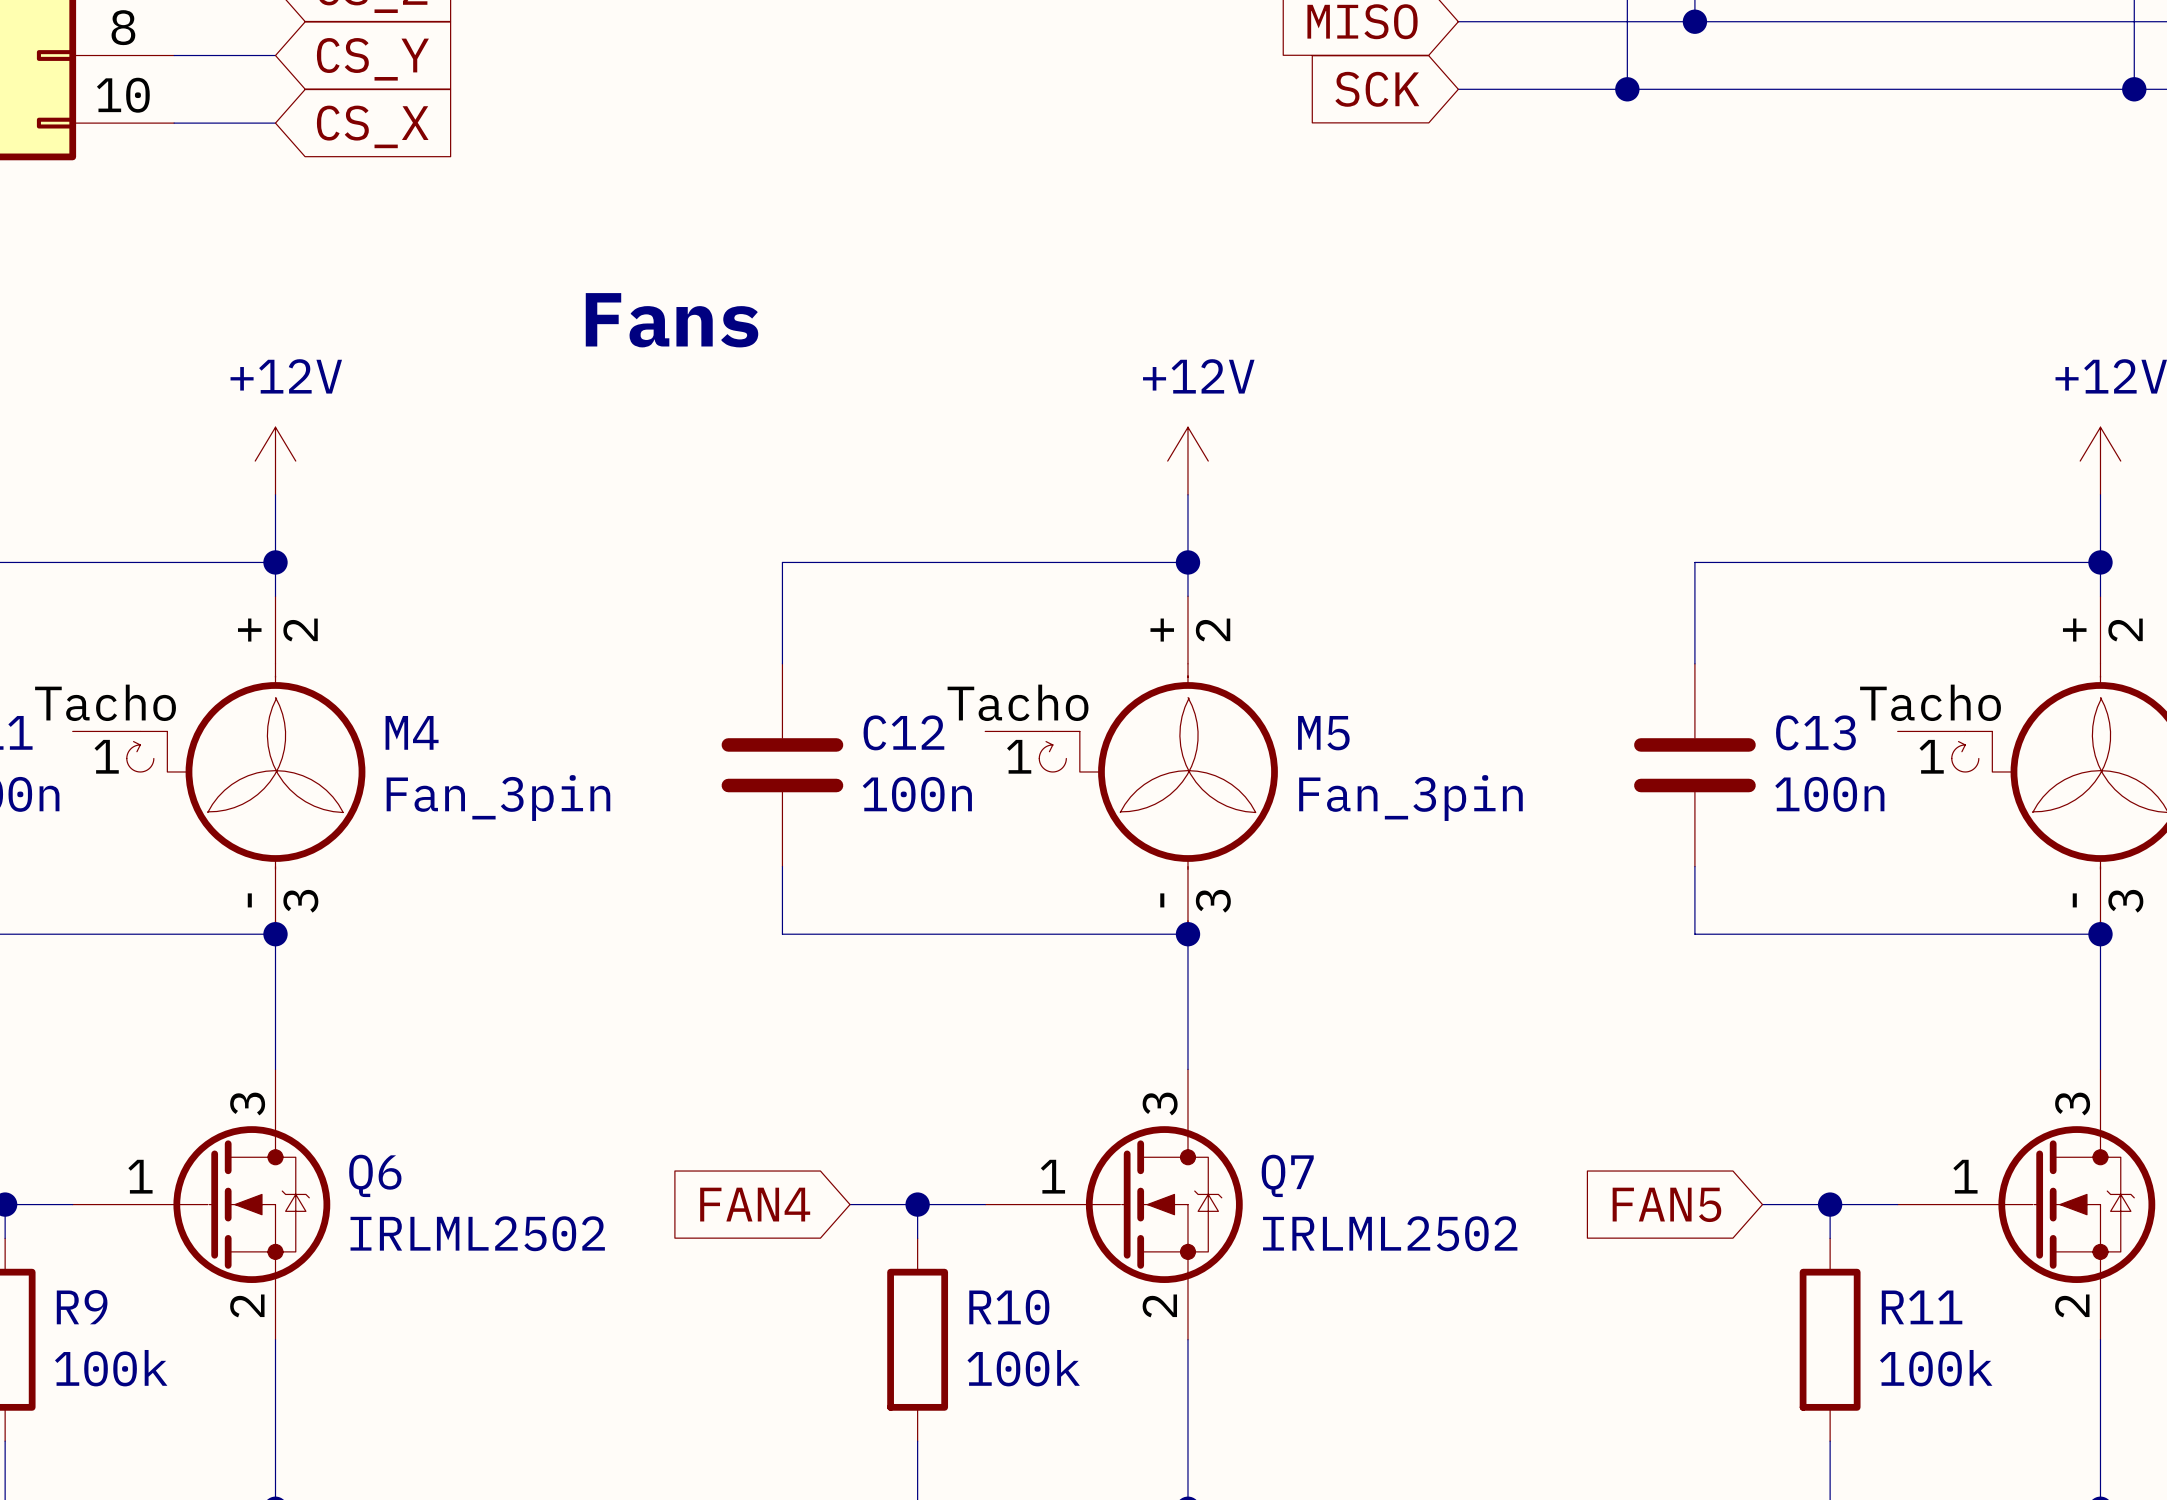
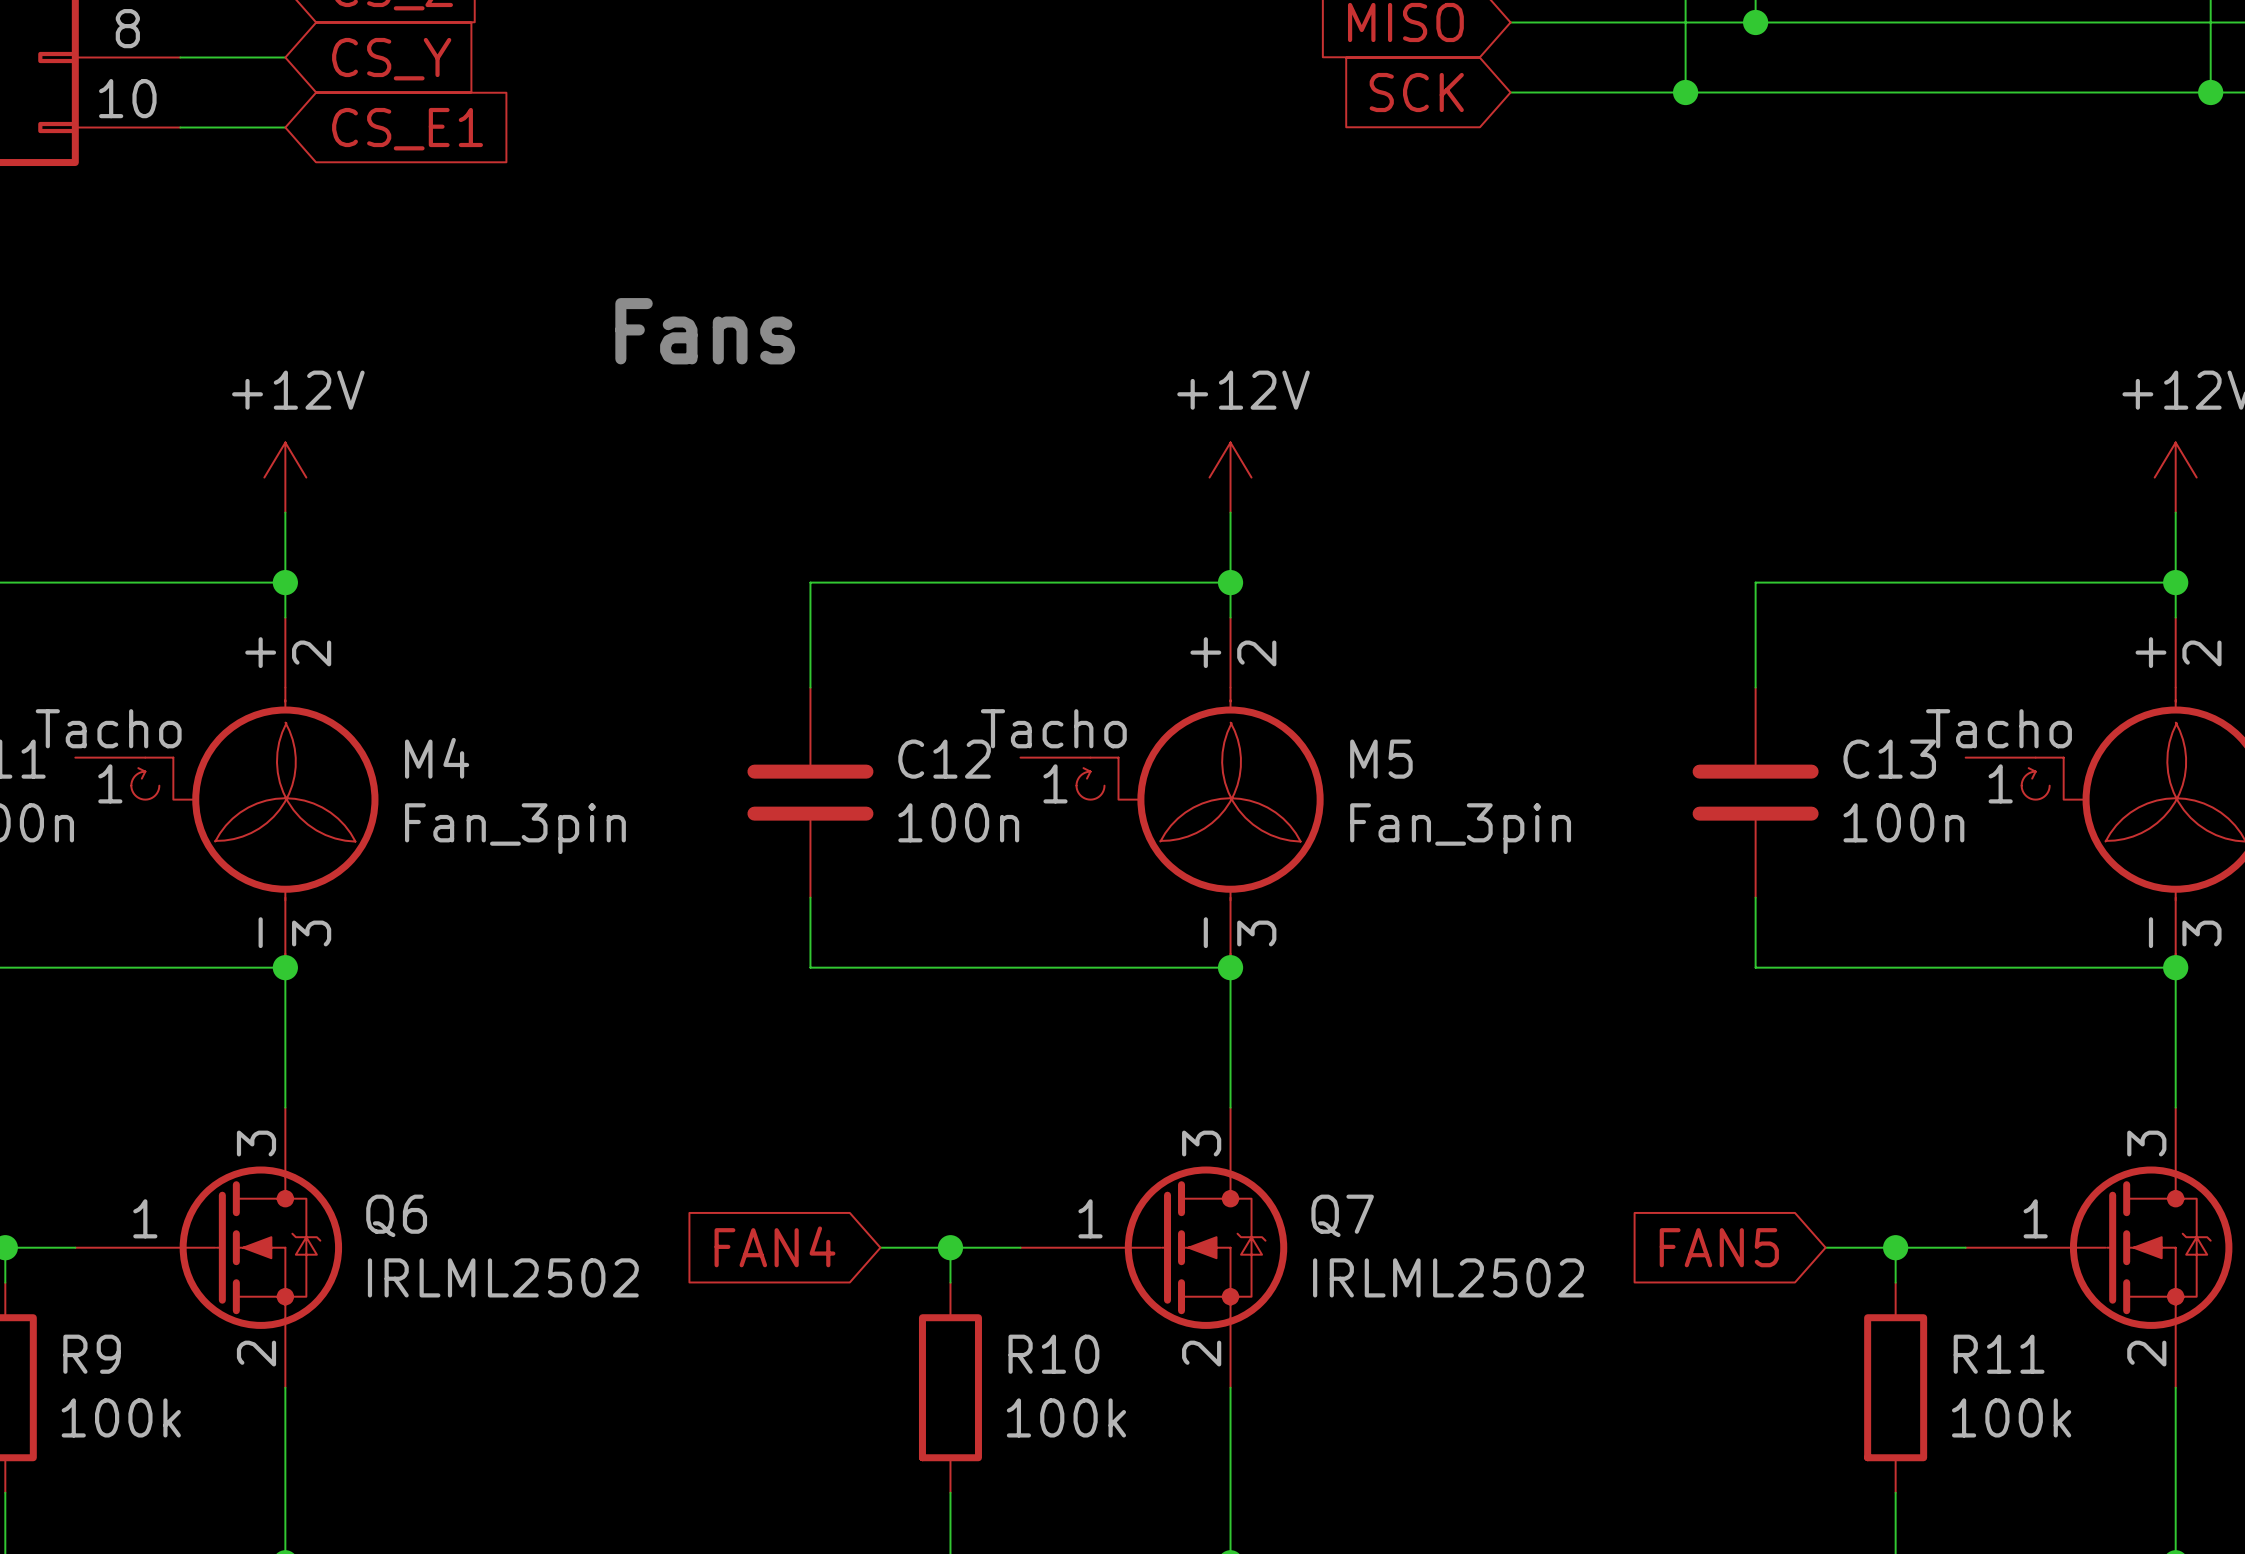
global label: CS_X (372, 126) -> CS_E1 (407, 129)

